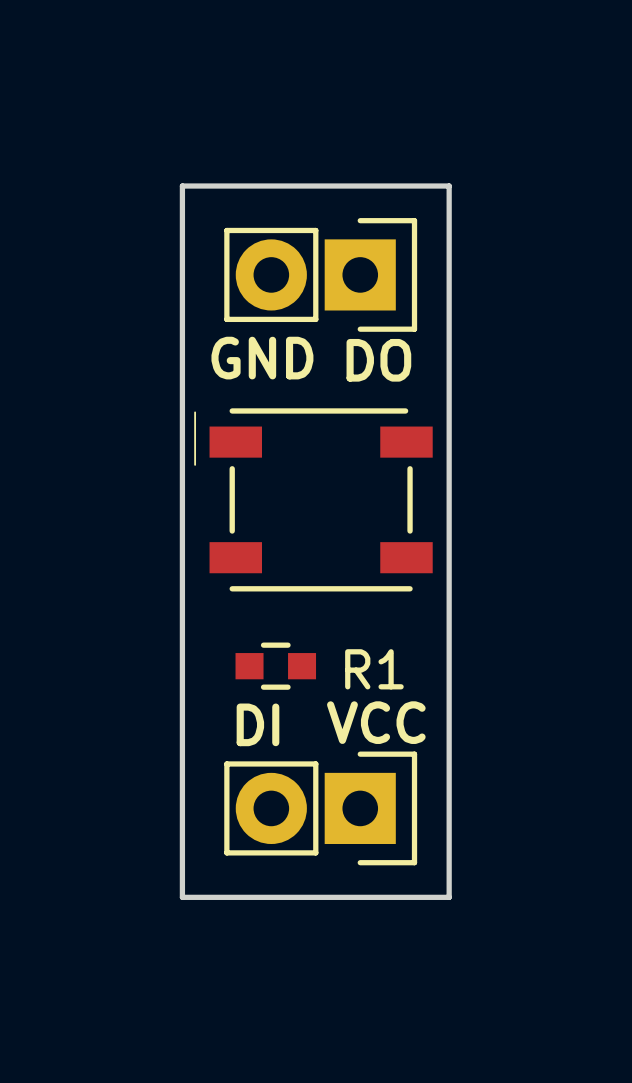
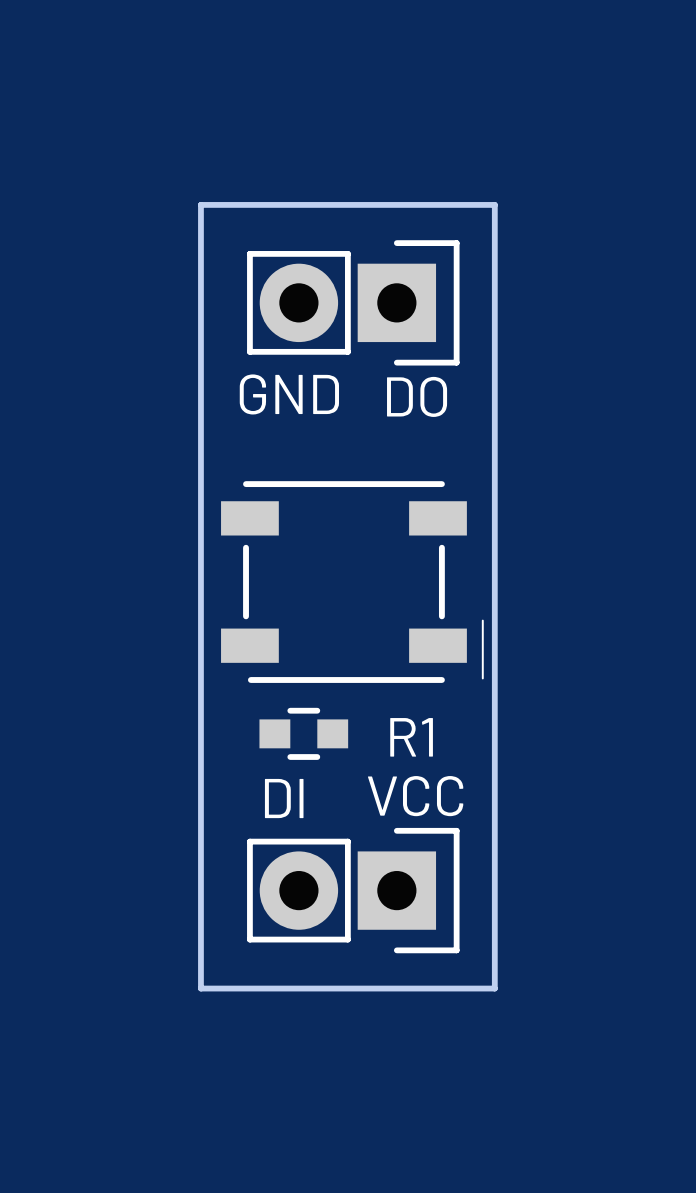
part rotation: 0° (313, 499) -> 180° (352, 582)

